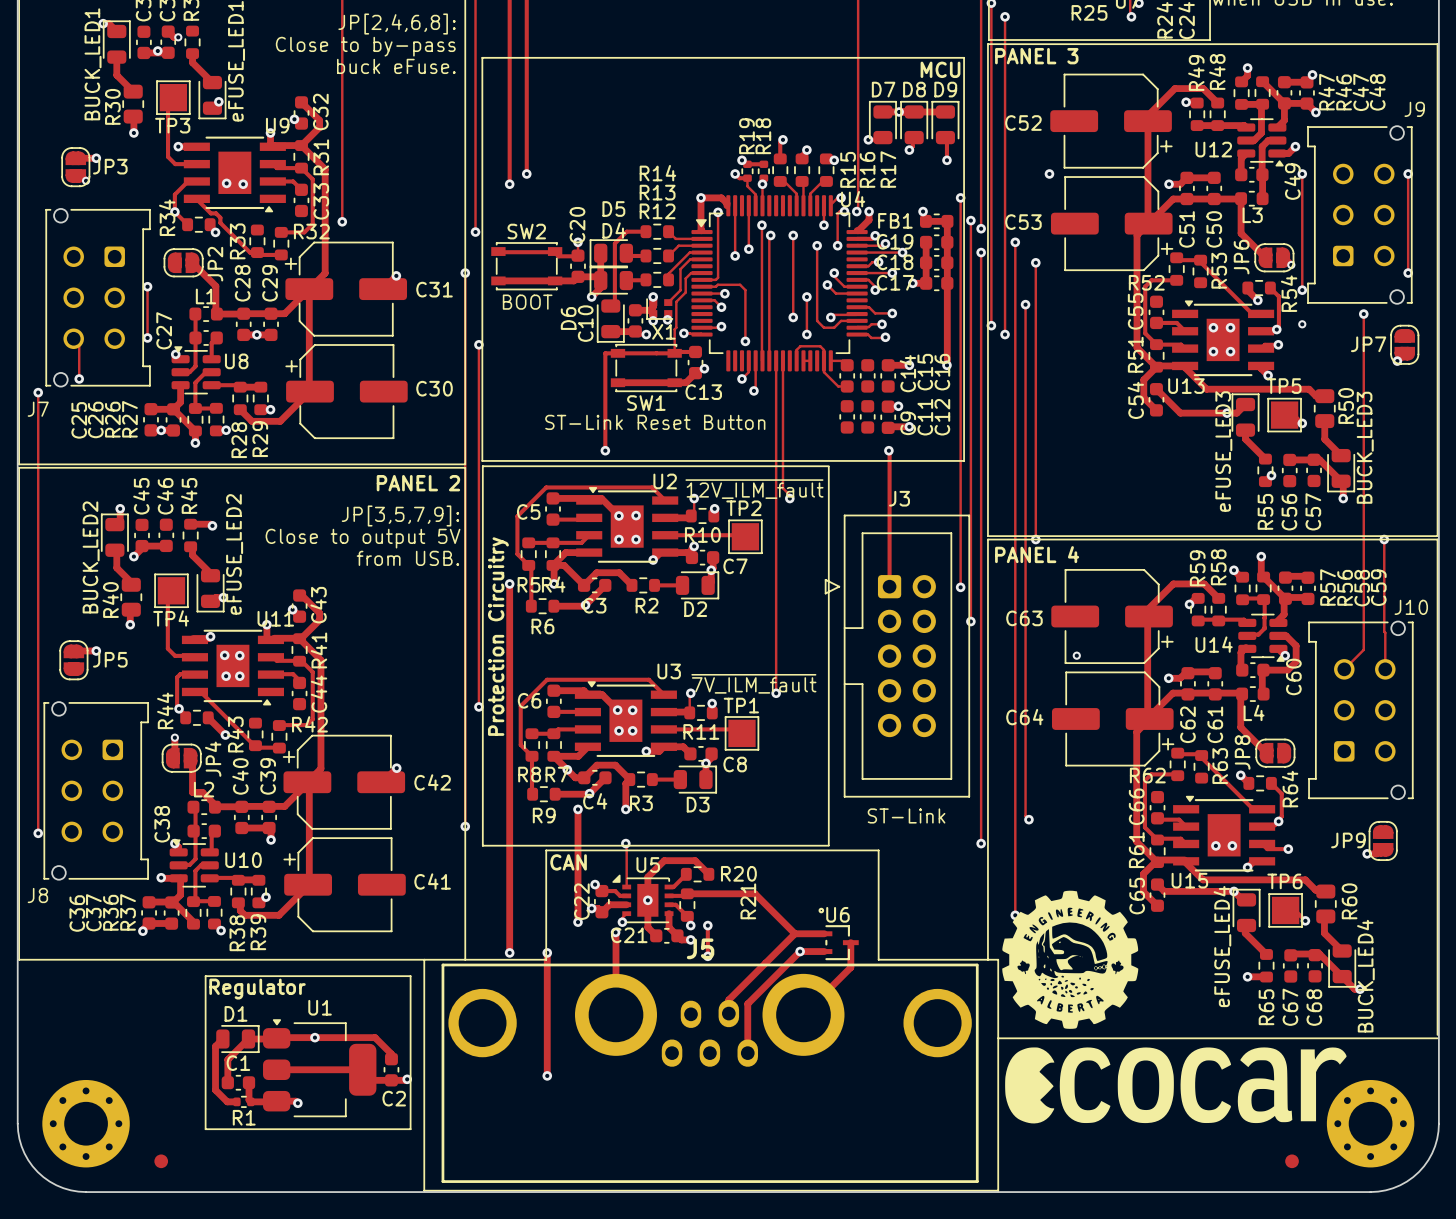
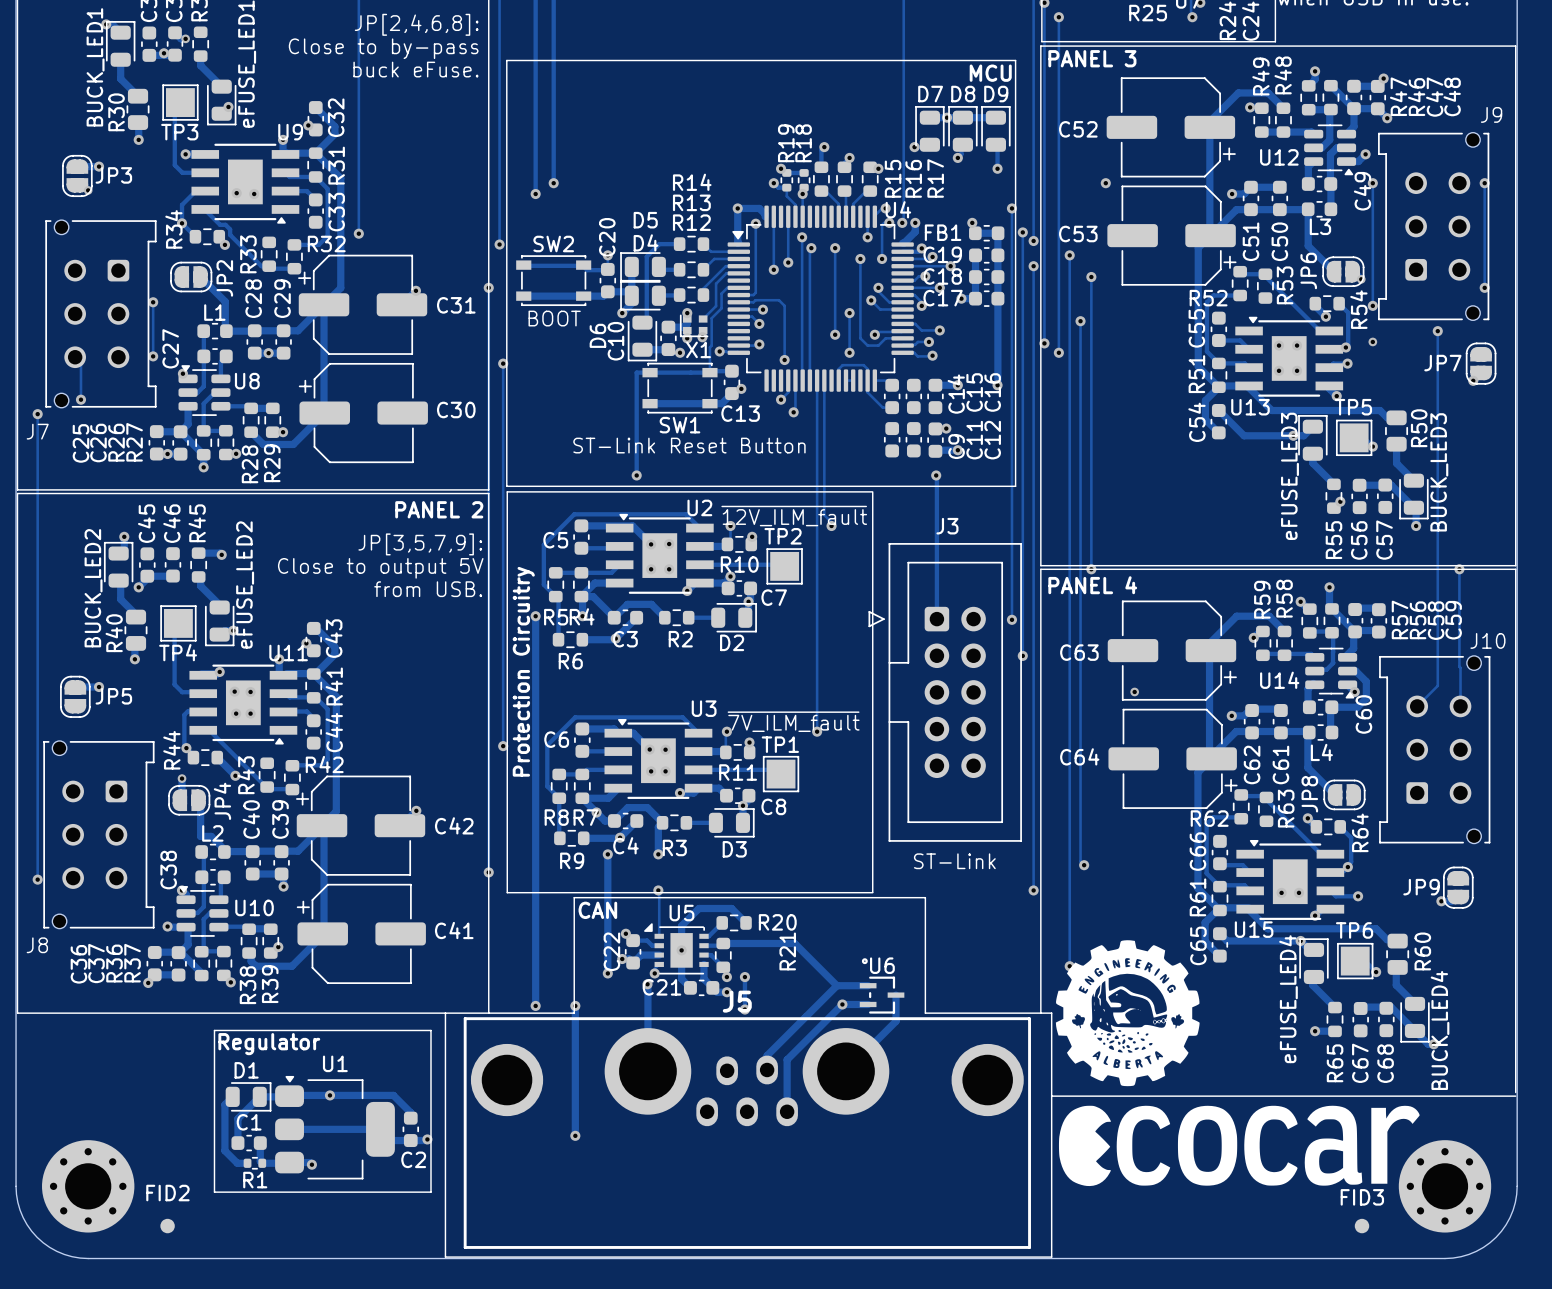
FID2 name: none -> FID2 (167, 1193)
FID3 name: none -> FID3 (1362, 1197)

